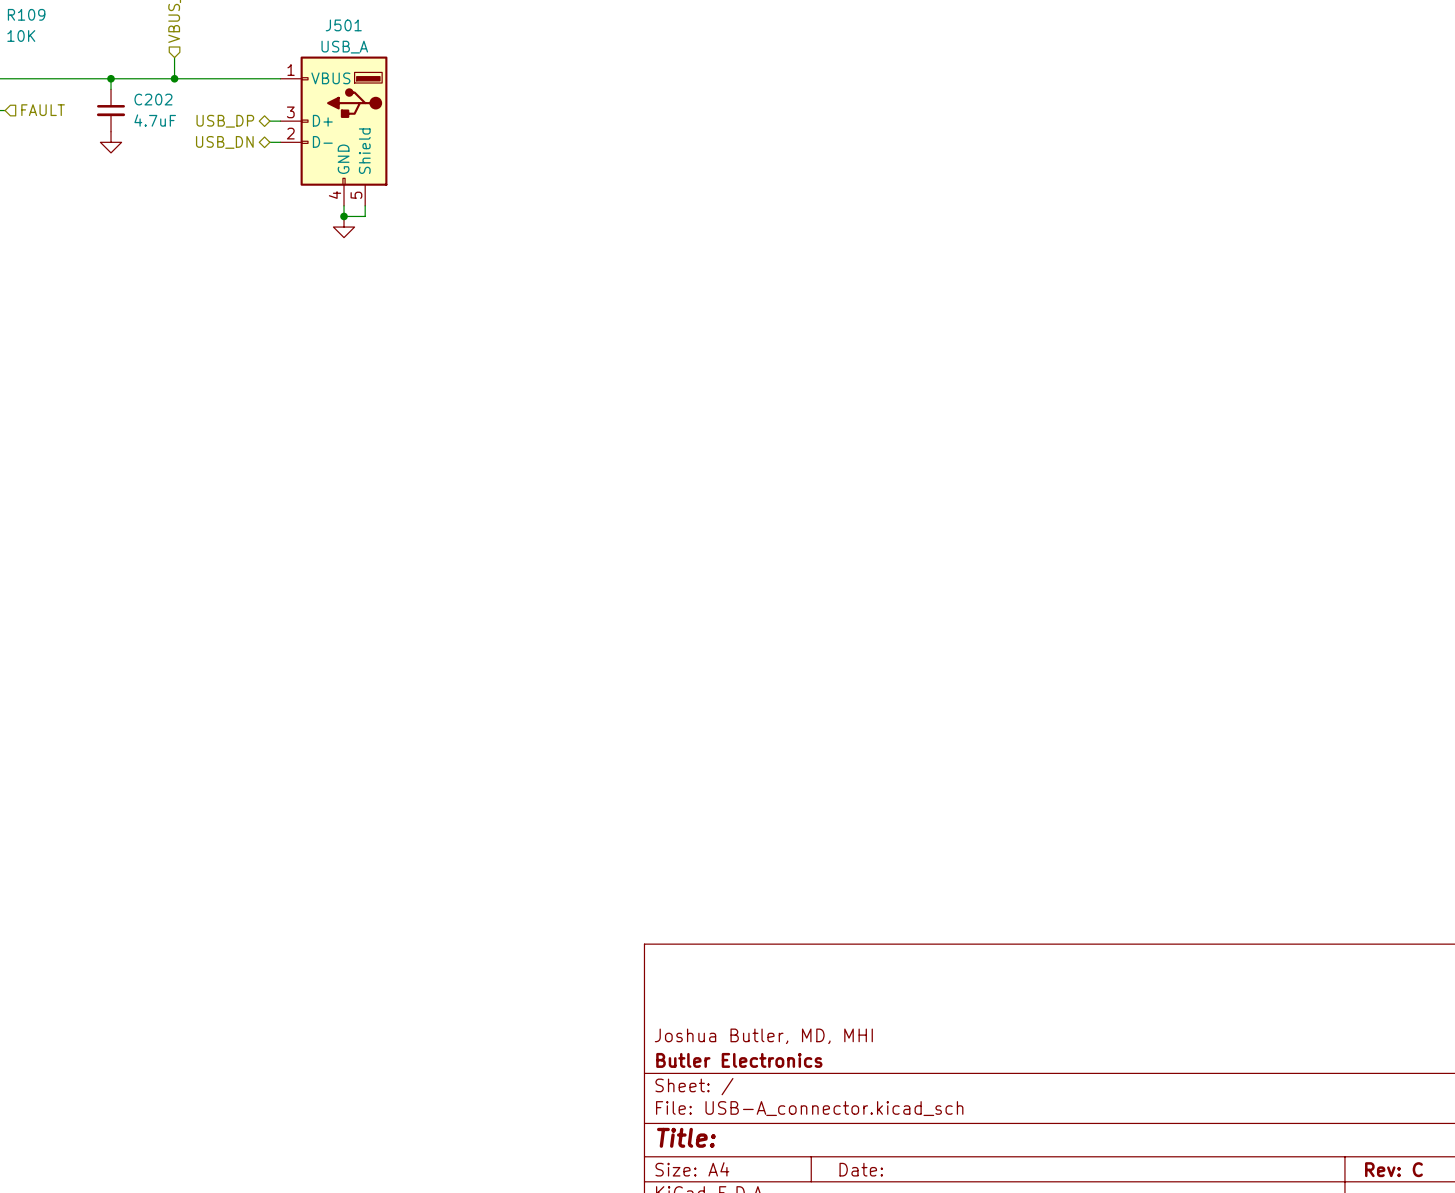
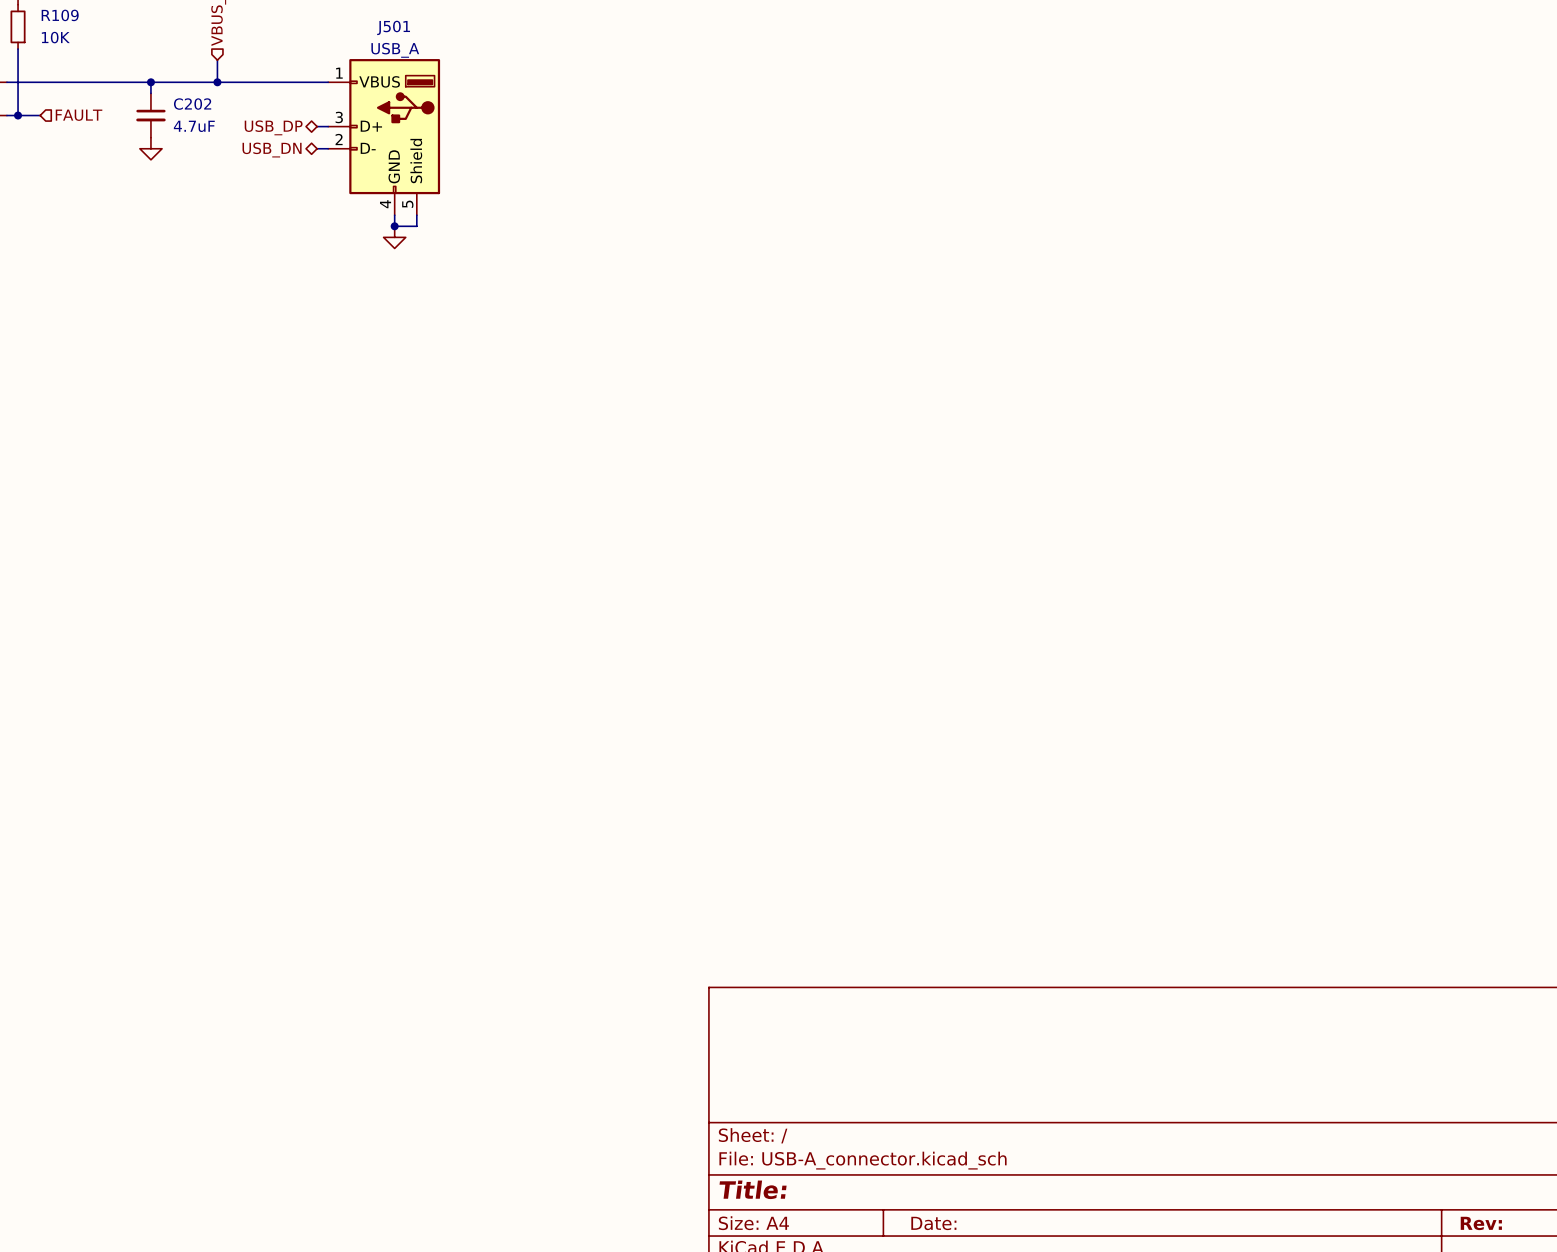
title block: Joshua Butler, MD, MHI (763, 1036) -> none
title block: Butler Electronics (739, 1060) -> none
title block: Rev: C (1393, 1169) -> Rev: (1481, 1223)

